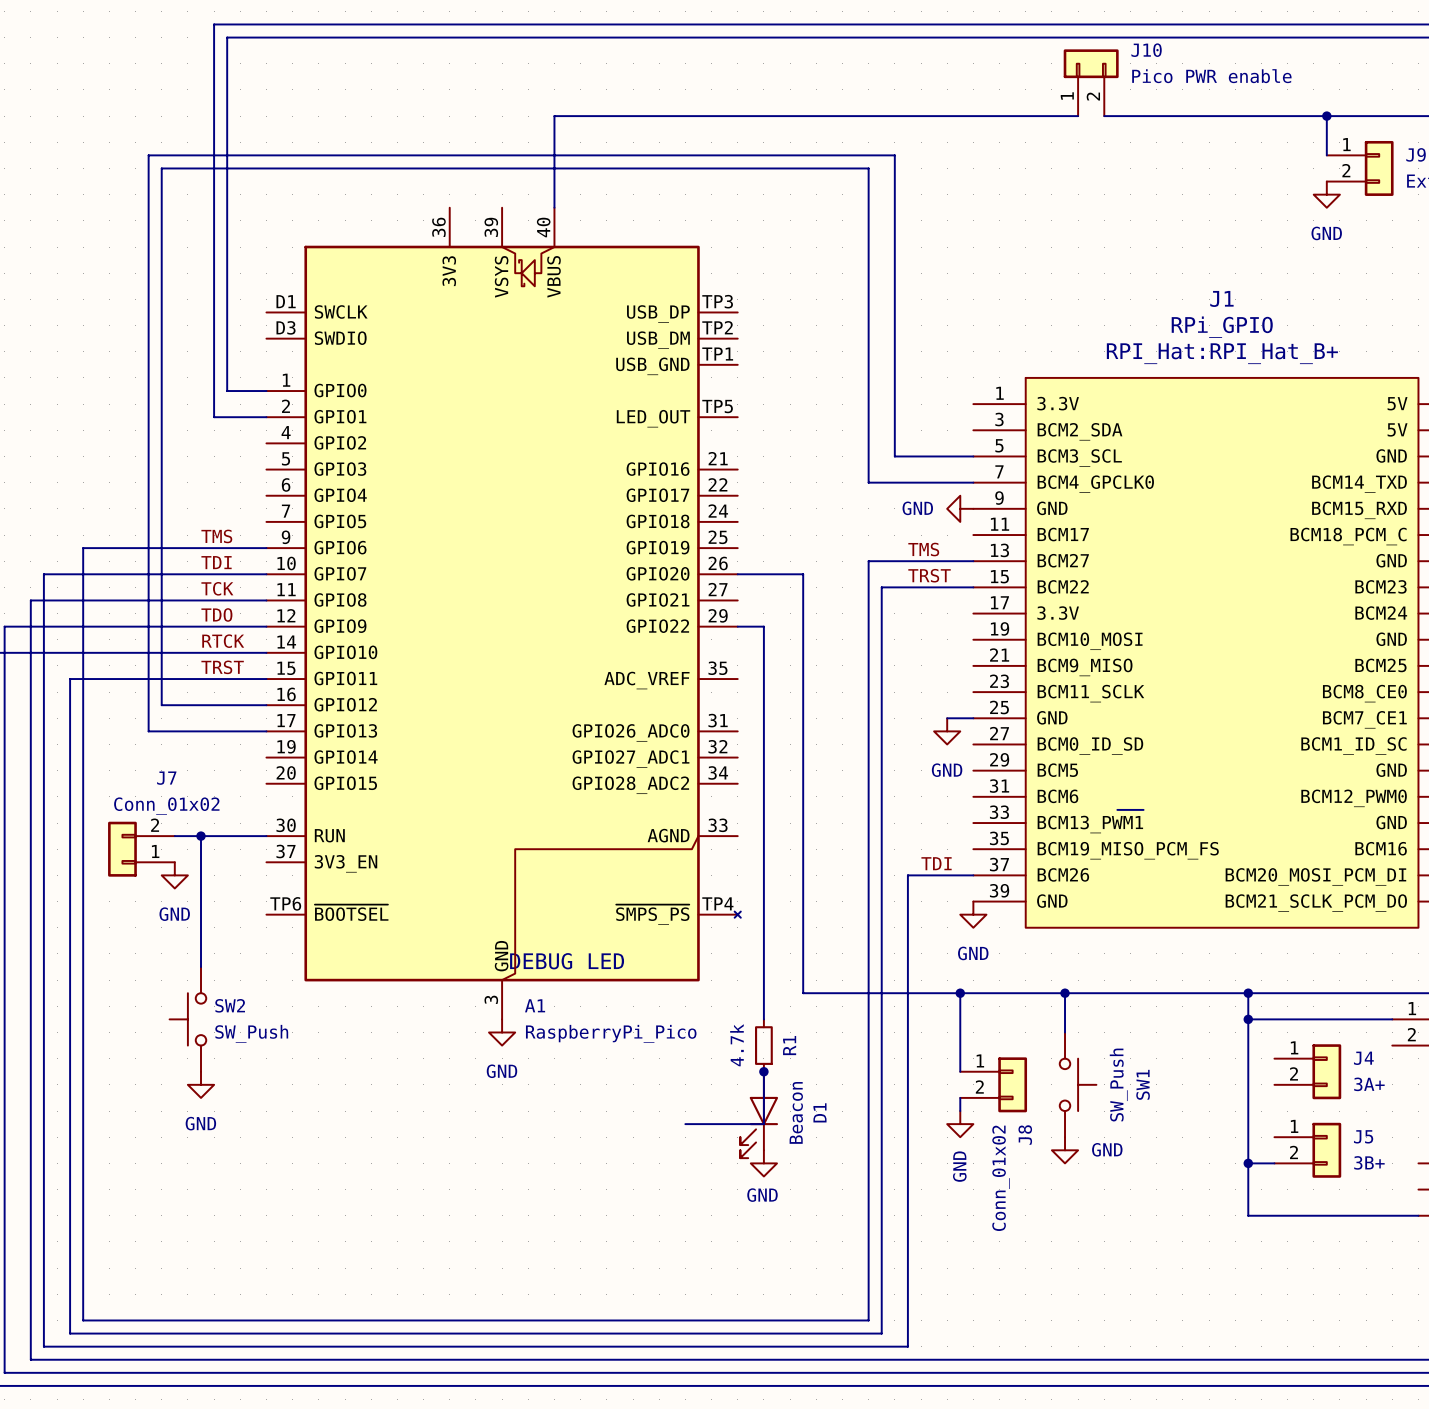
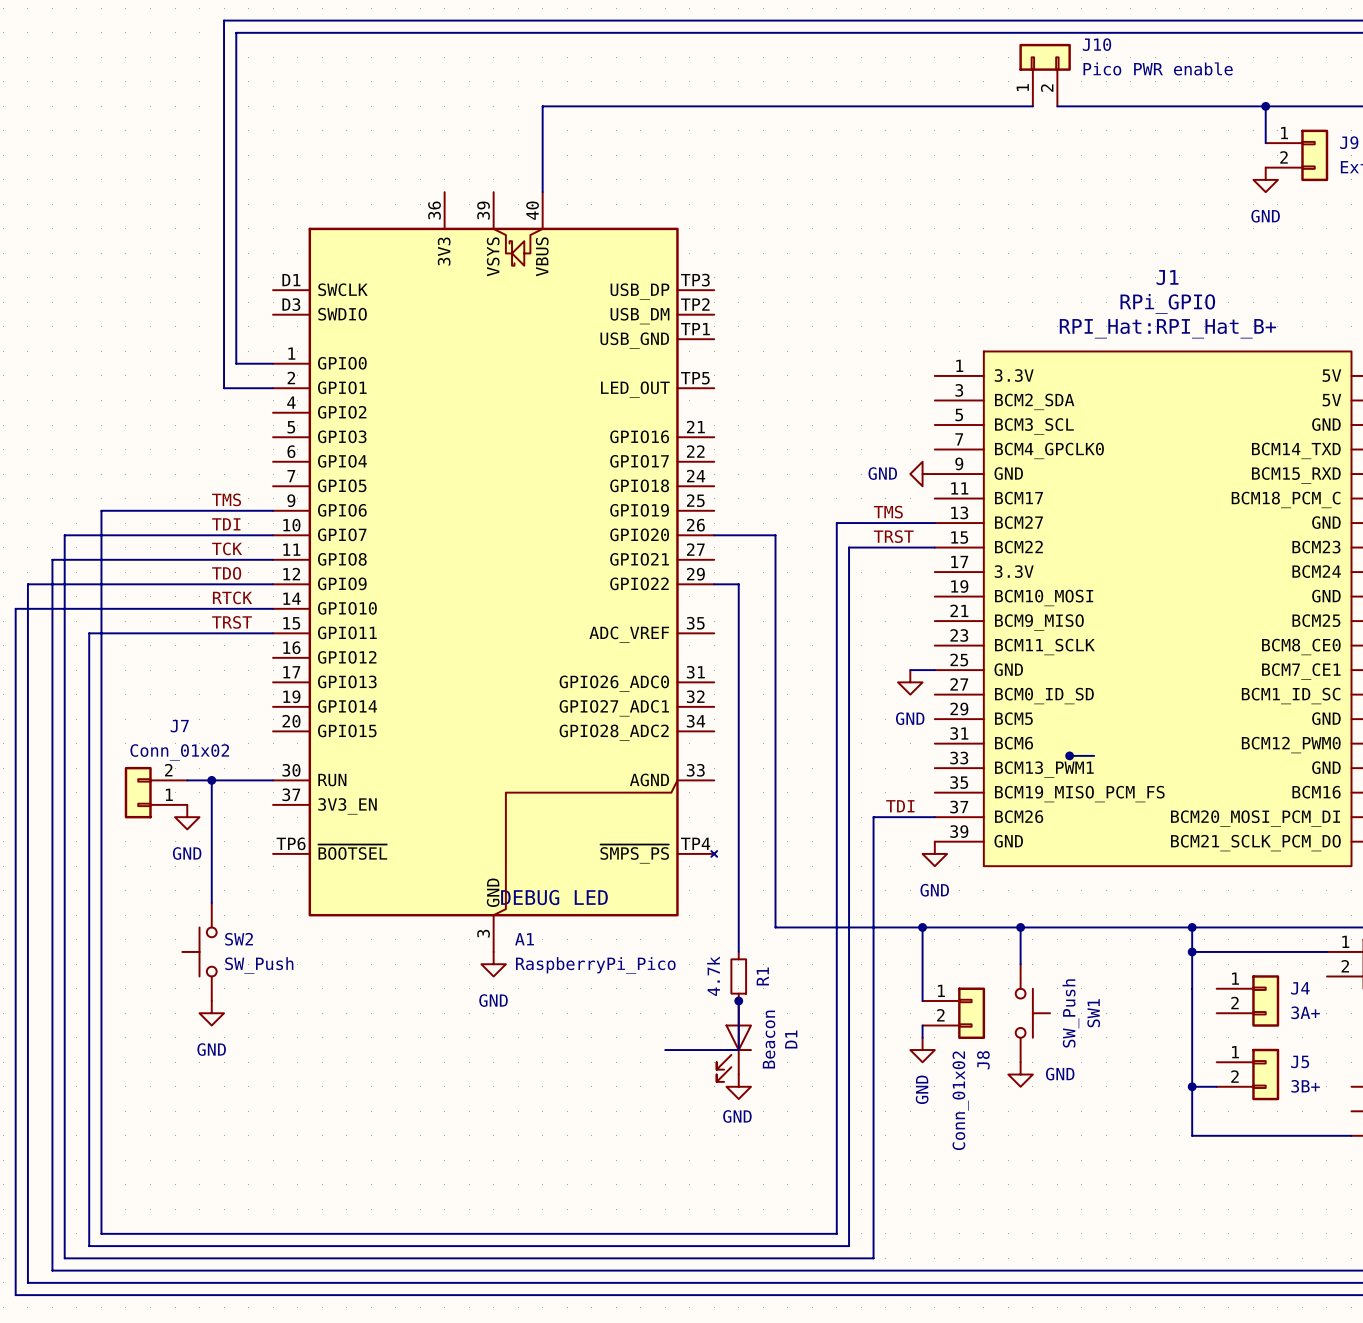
wire: (973, 456) (894, 456) (894, 155) (148, 155) (148, 731) (266, 731) -> none
wire: (973, 482) (868, 482) (868, 168) (161, 168) (161, 705) (266, 705) -> none
junction: none -> (1069, 755)

